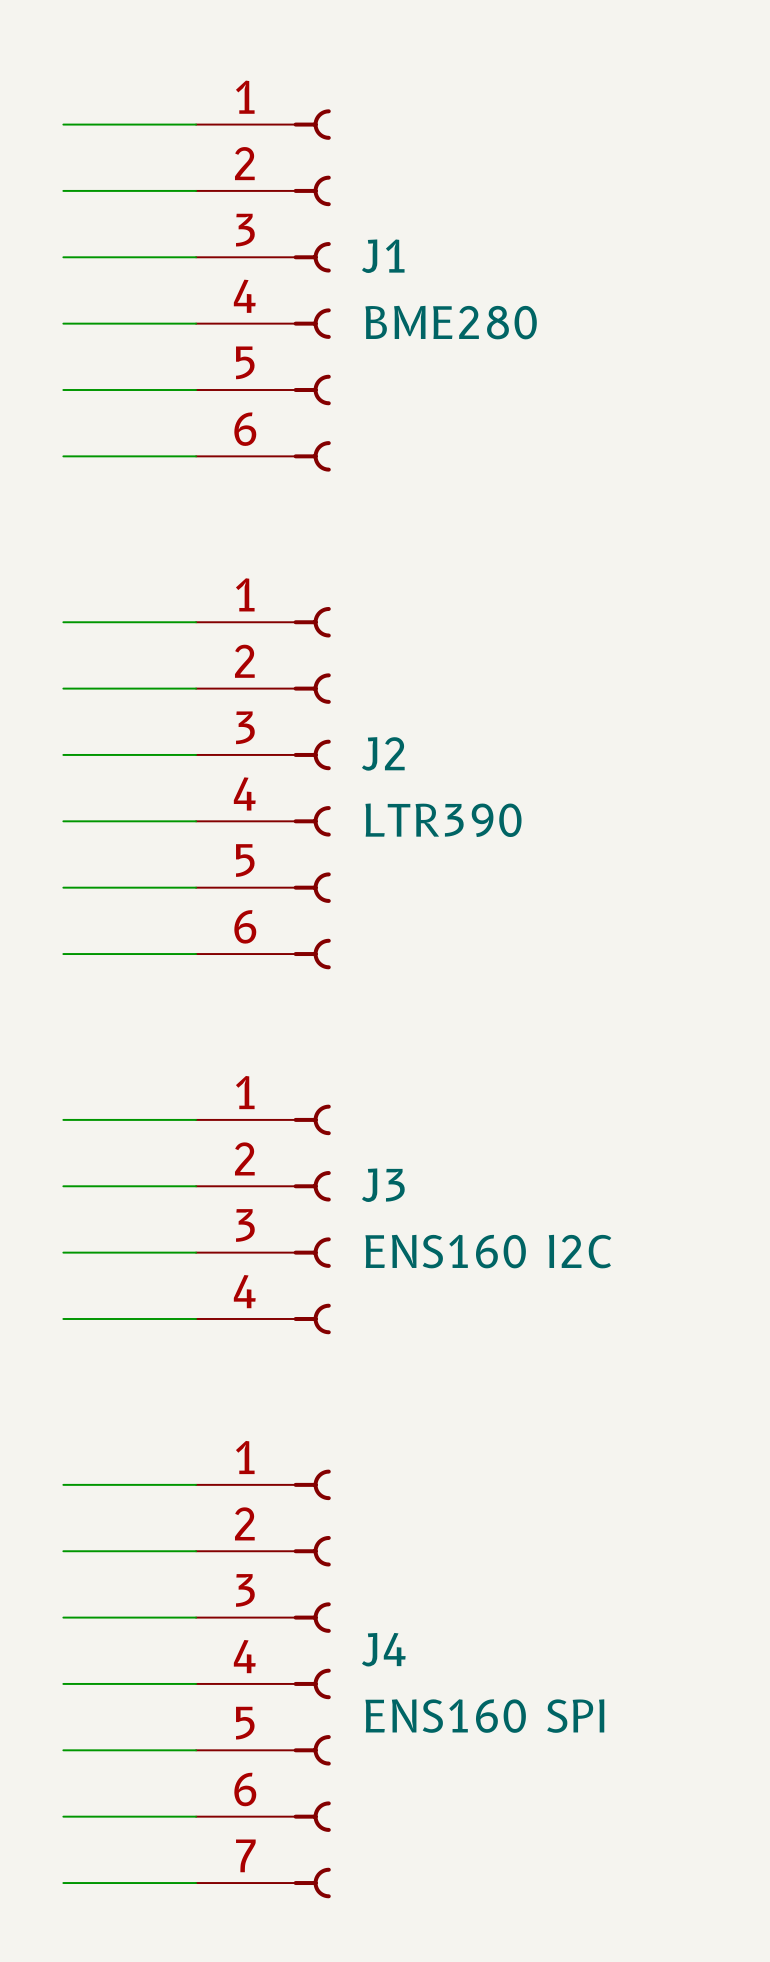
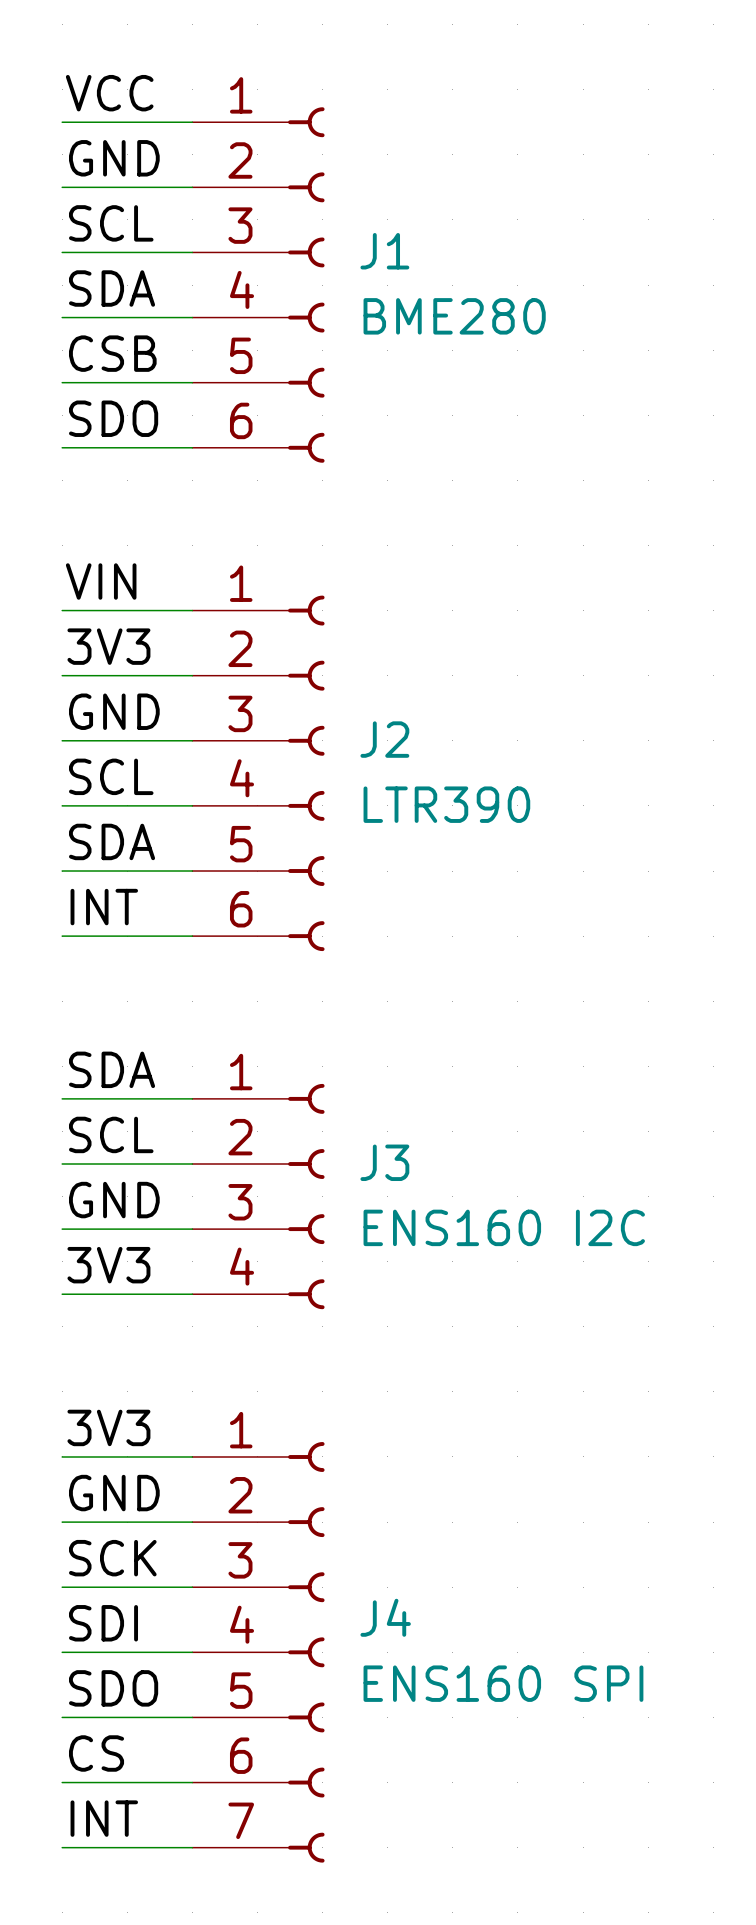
label: none -> VCC (109, 93)
label: none -> GND (114, 158)
label: none -> SCL (111, 223)
label: none -> SDA (112, 288)
label: none -> CSB (112, 353)
label: none -> SDO (113, 418)
label: none -> VIN (101, 581)
label: none -> 3V3 (108, 646)
label: none -> GND (114, 711)
label: none -> SCL (111, 776)
label: none -> SDA (112, 841)
label: none -> INT (104, 907)
label: none -> SDA (112, 1069)
label: none -> SCL (111, 1134)
label: none -> GND (114, 1200)
label: none -> 3V3 (108, 1265)
label: none -> 3V3 (108, 1427)
label: none -> GND (114, 1493)
label: none -> SCK (112, 1558)
label: none -> SDI (103, 1623)
label: none -> SDO (113, 1688)
label: none -> CS (96, 1753)
label: none -> INT (104, 1818)

